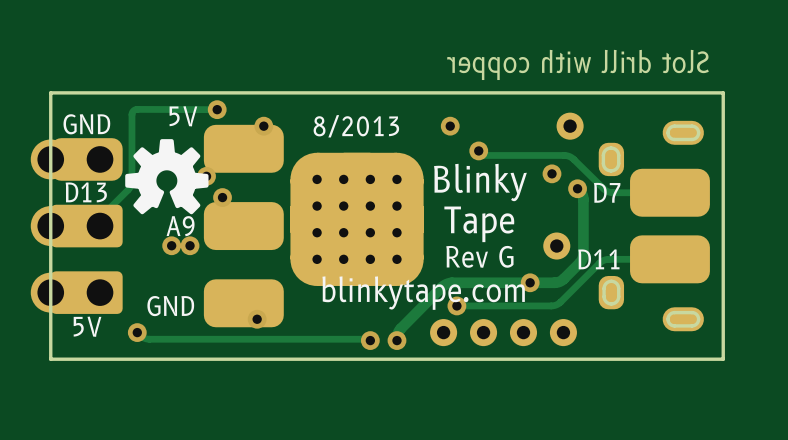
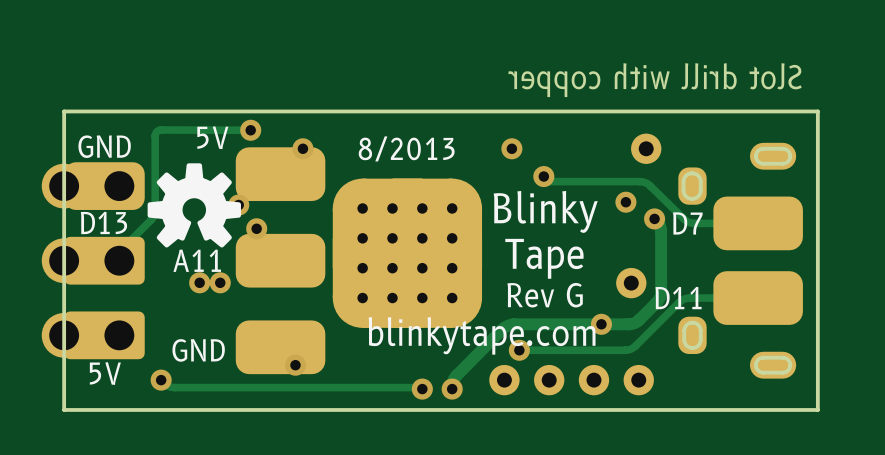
text: A9 (180, 226) -> A11 (197, 260)

